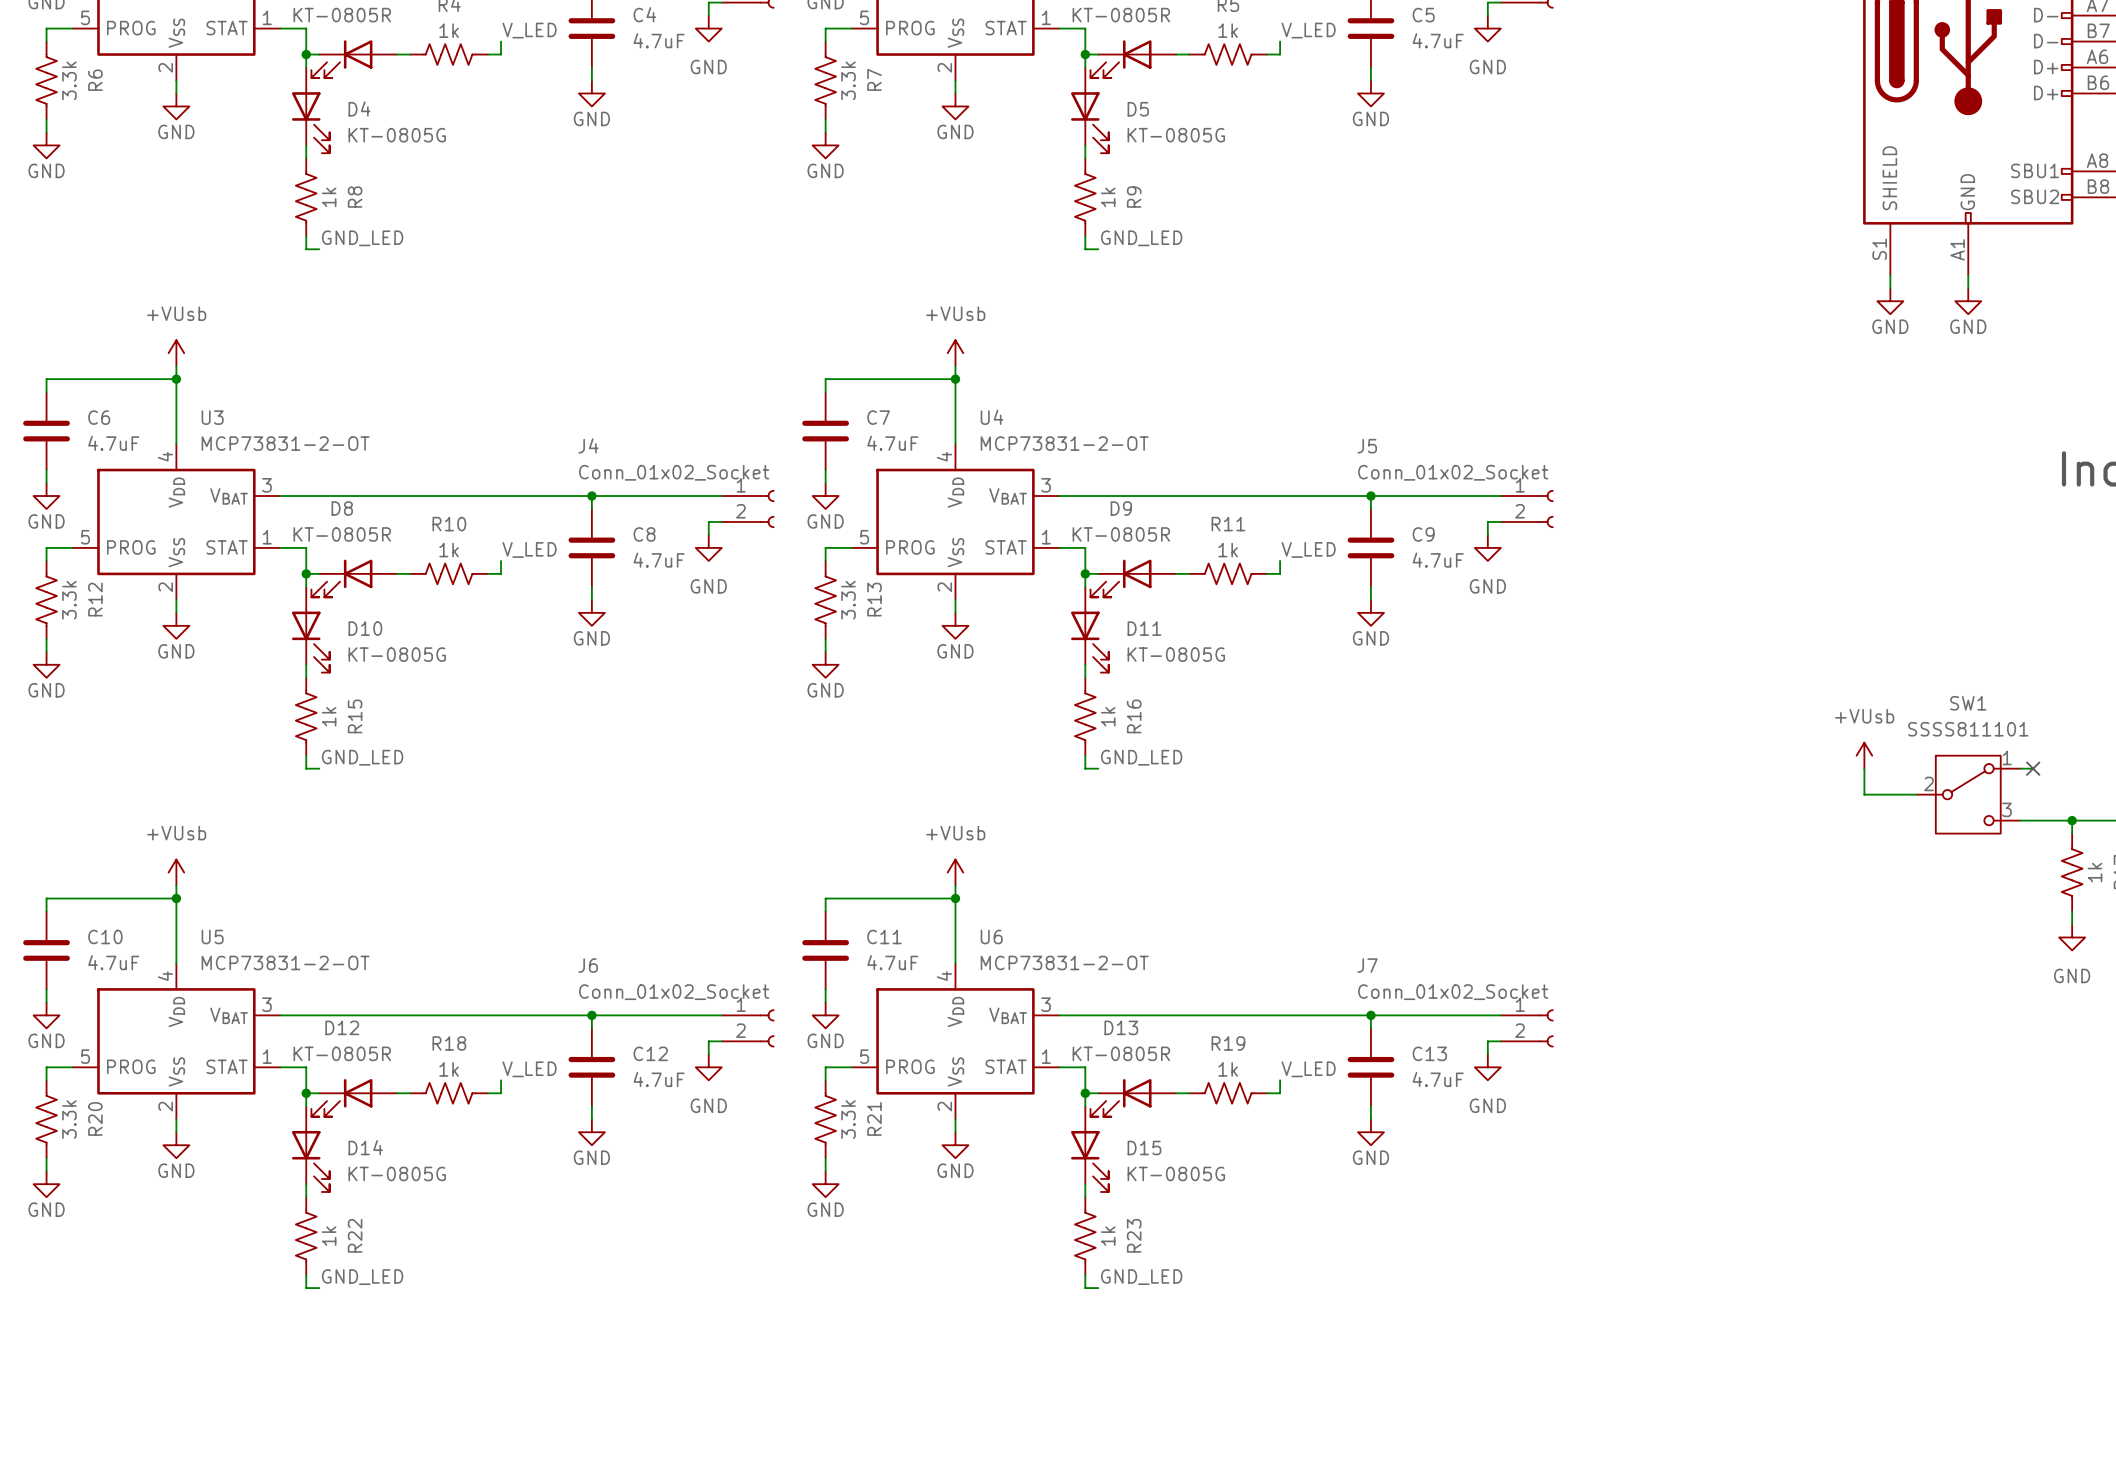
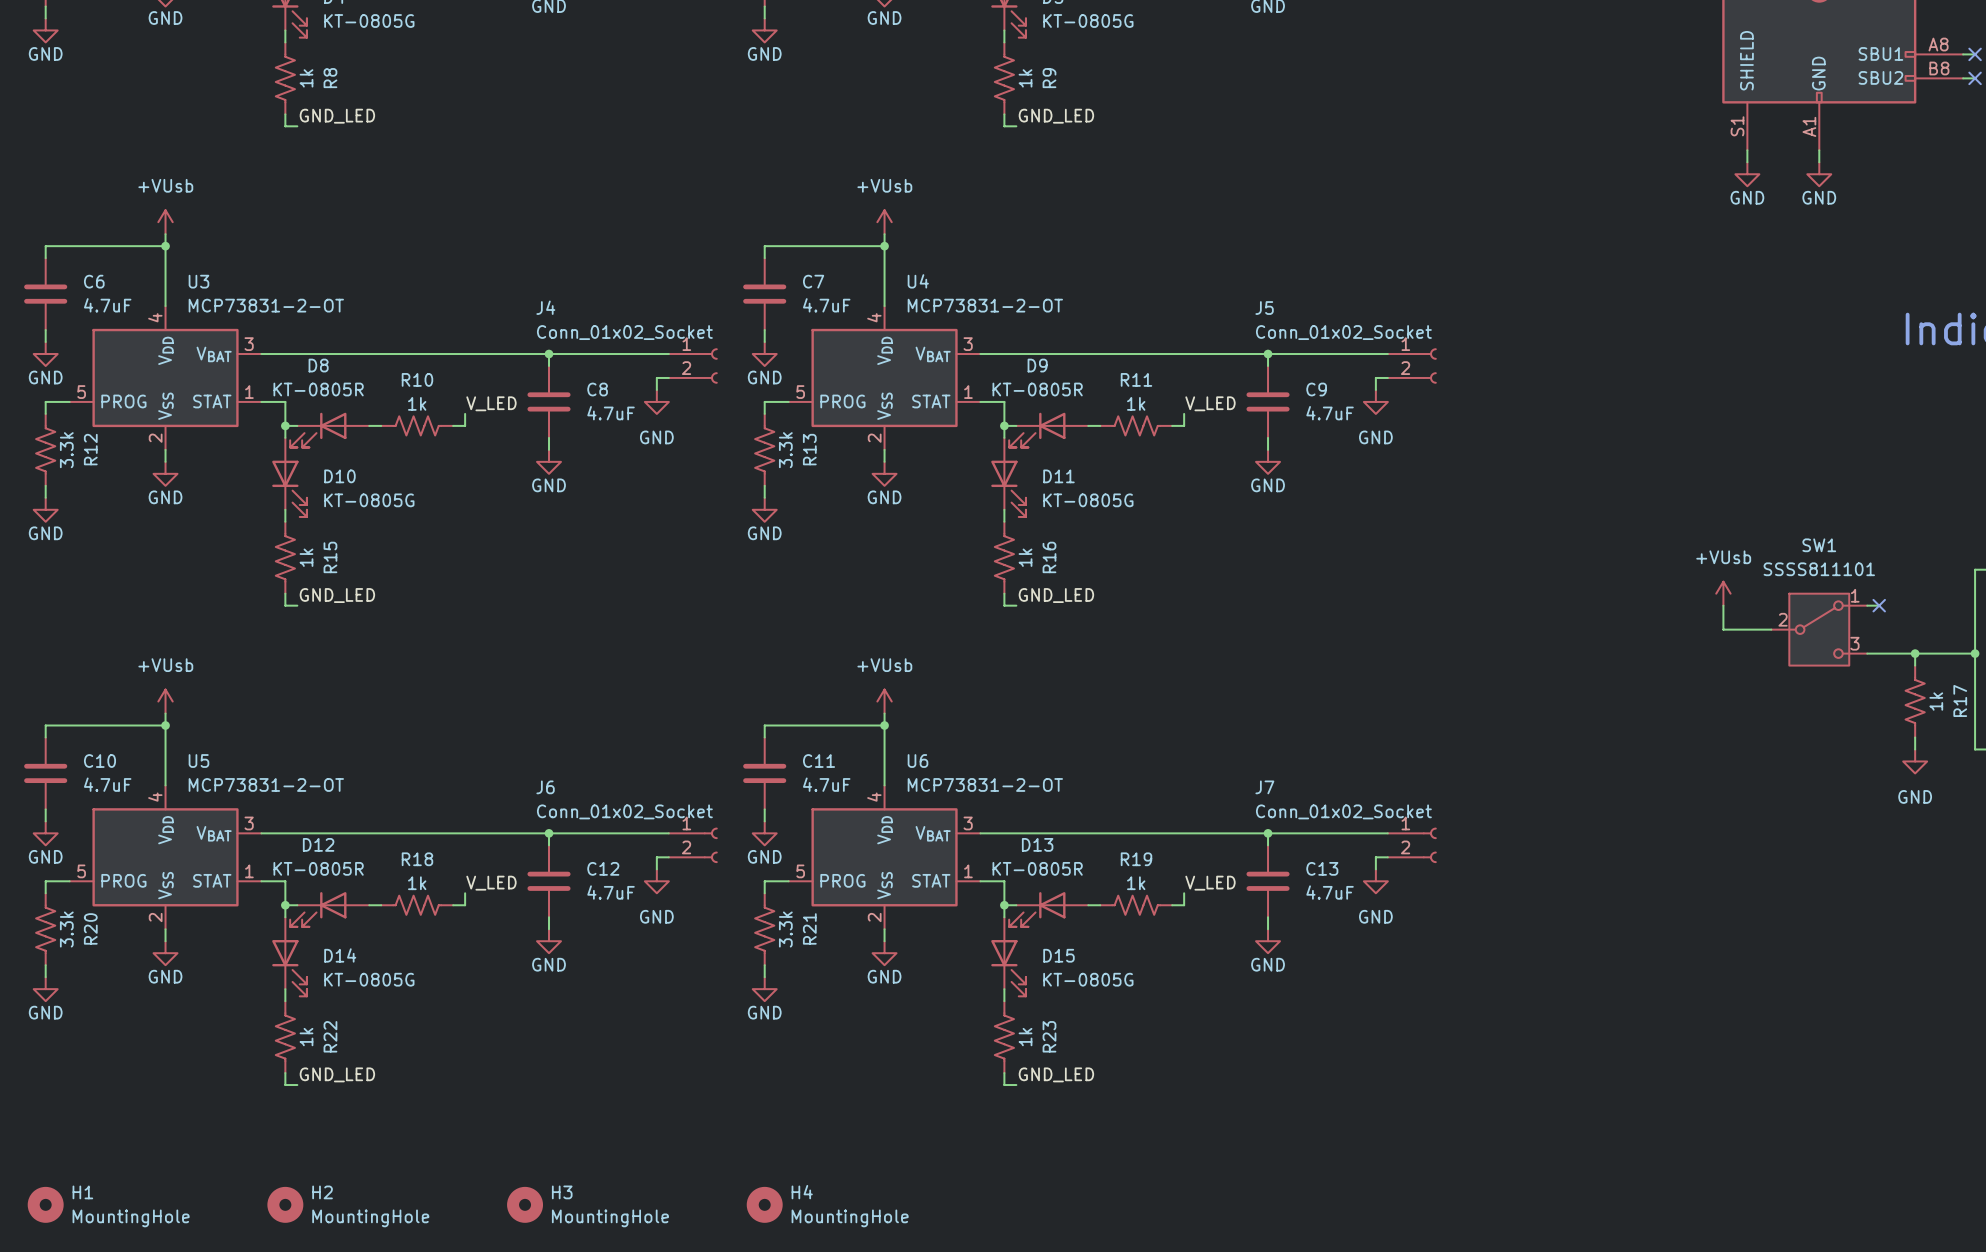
H1: none -> MountingHole (45, 1204)
H2: none -> MountingHole (285, 1204)
H3: none -> MountingHole (525, 1204)
H4: none -> MountingHole (764, 1204)

